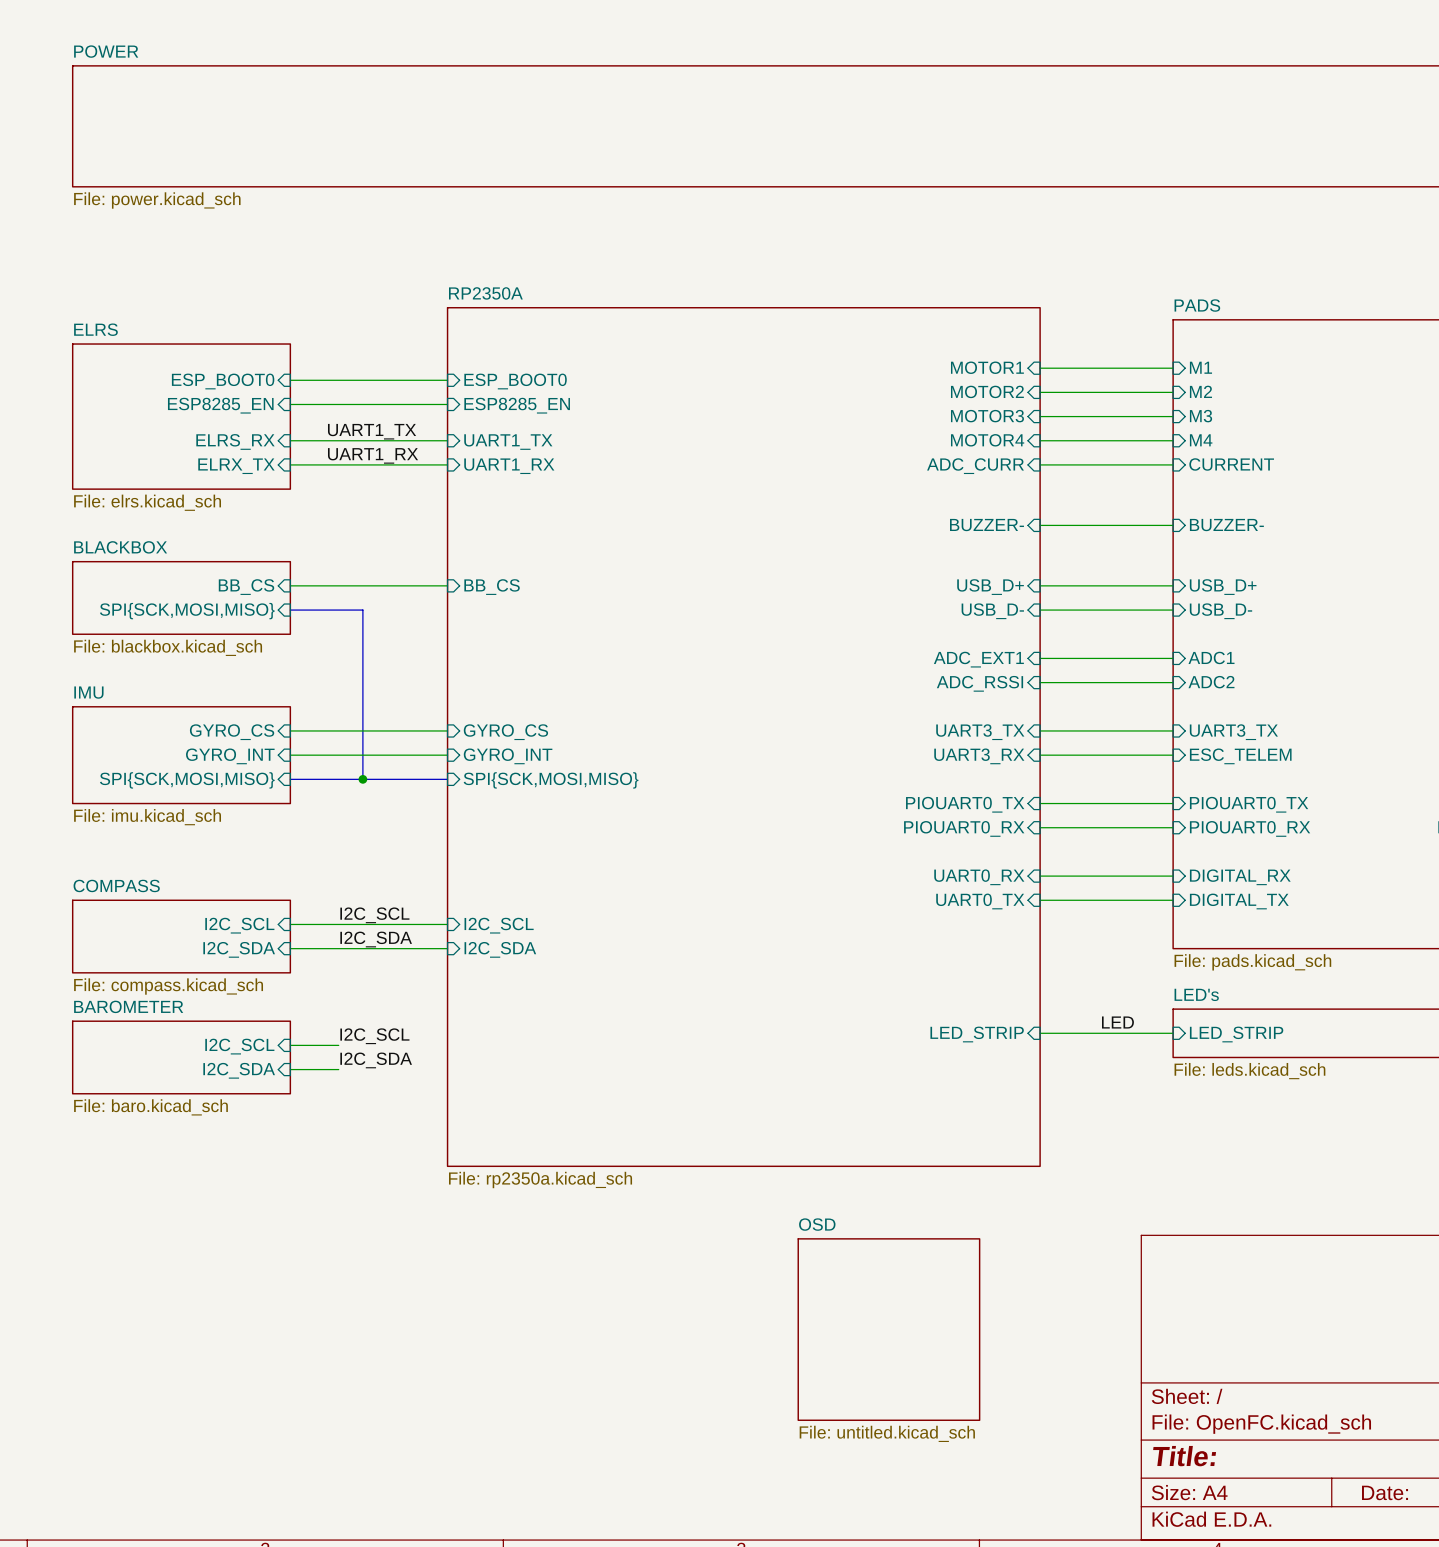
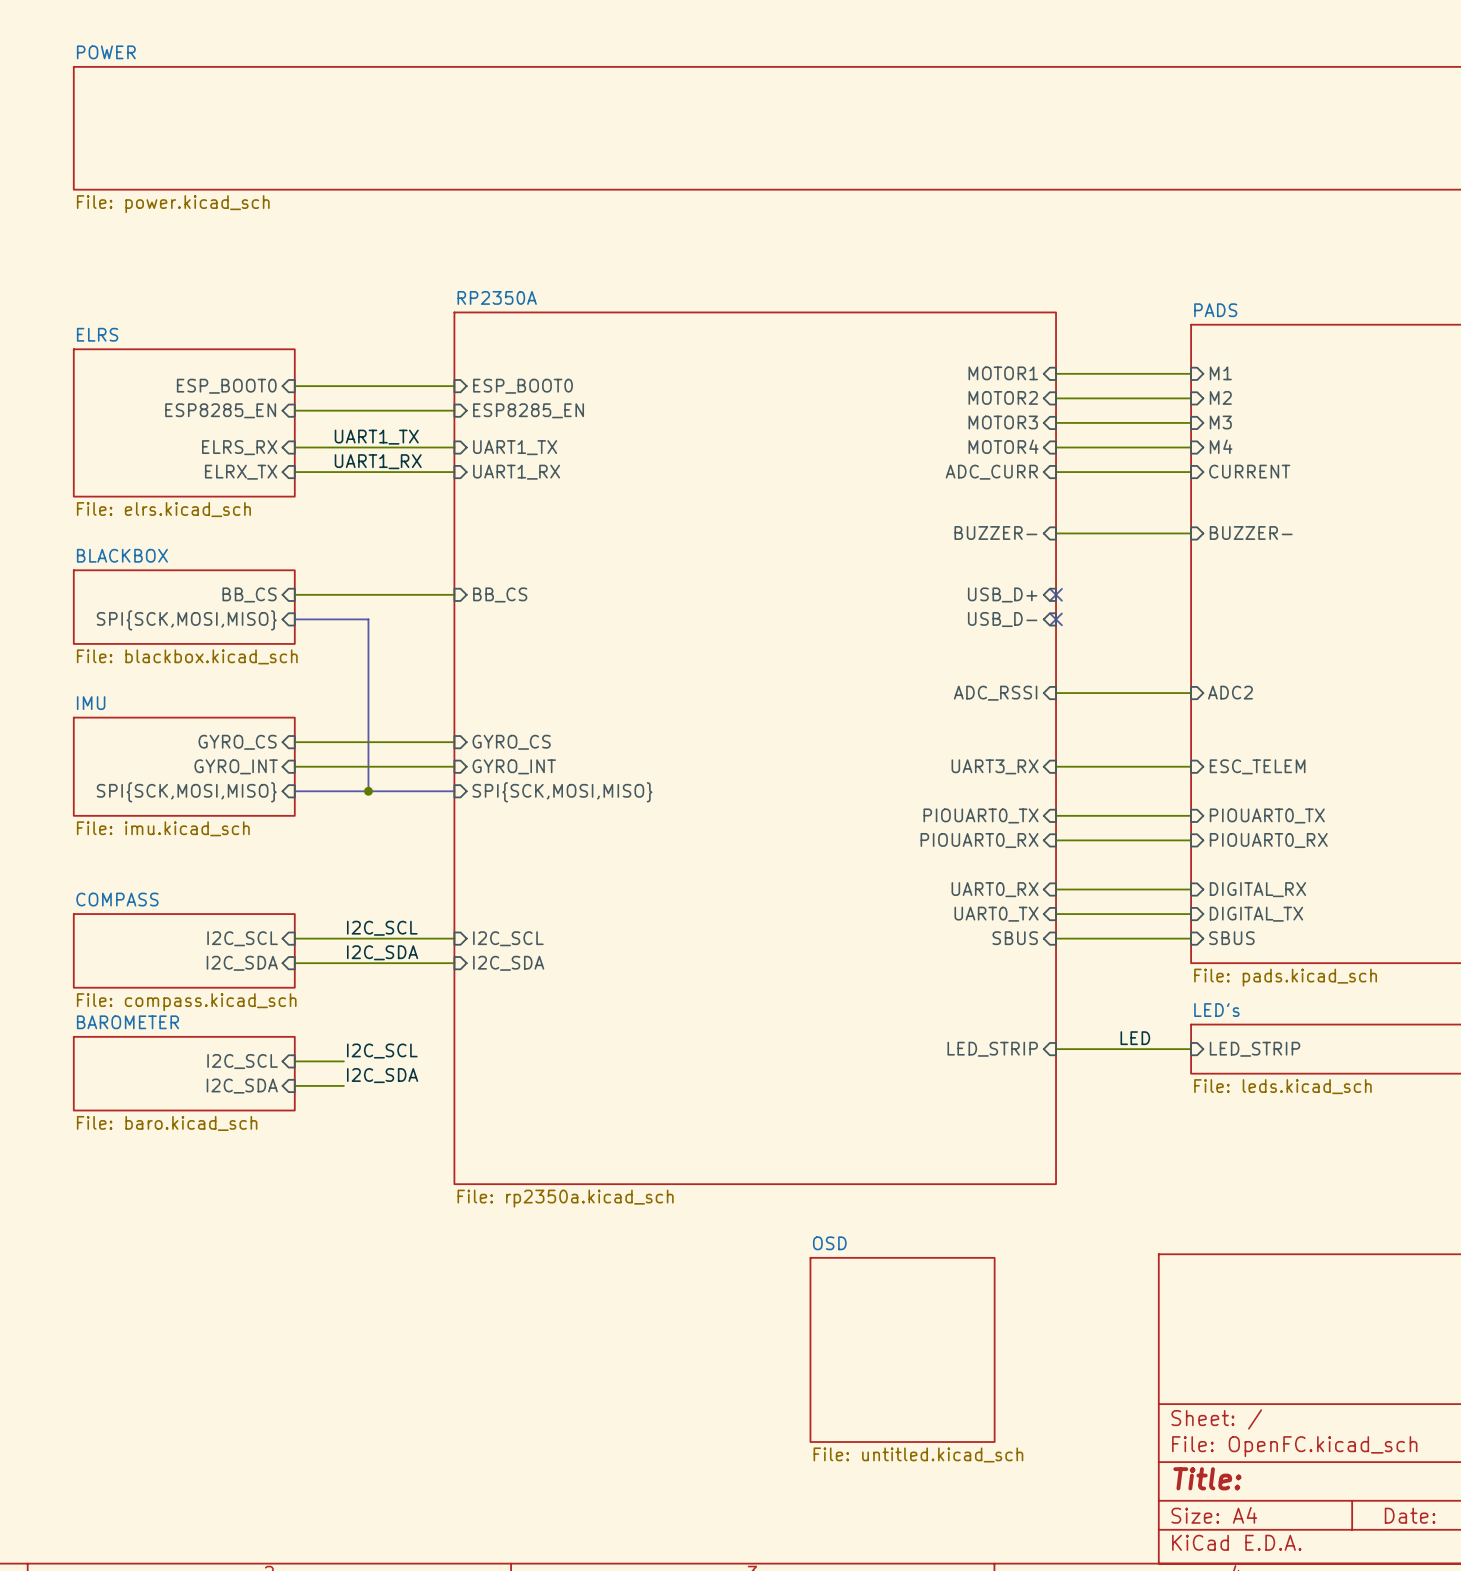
wire: (1040, 585) (1173, 585) -> none
no-connect mark: none -> (1056, 594)
sheet pin: USB_D+ (1223, 587) -> none
wire: (1040, 610) (1173, 610) -> none
no-connect mark: none -> (1056, 619)
sheet pin: USB_D- (1220, 611) -> none
sheet pin: ADC1 (1211, 657) -> none
wire: (1040, 658) (1173, 658) -> none
sheet pin: ADC_EXT1 (978, 659) -> none
wire: (1040, 730) (1173, 730) -> (1056, 938) (1191, 938)
sheet pin: UART3_TX (980, 732) -> none
sheet pin: UART3_TX (1233, 732) -> none
sheet pin: none -> SBUS (1015, 938)
sheet pin: none -> SBUS (1231, 938)

